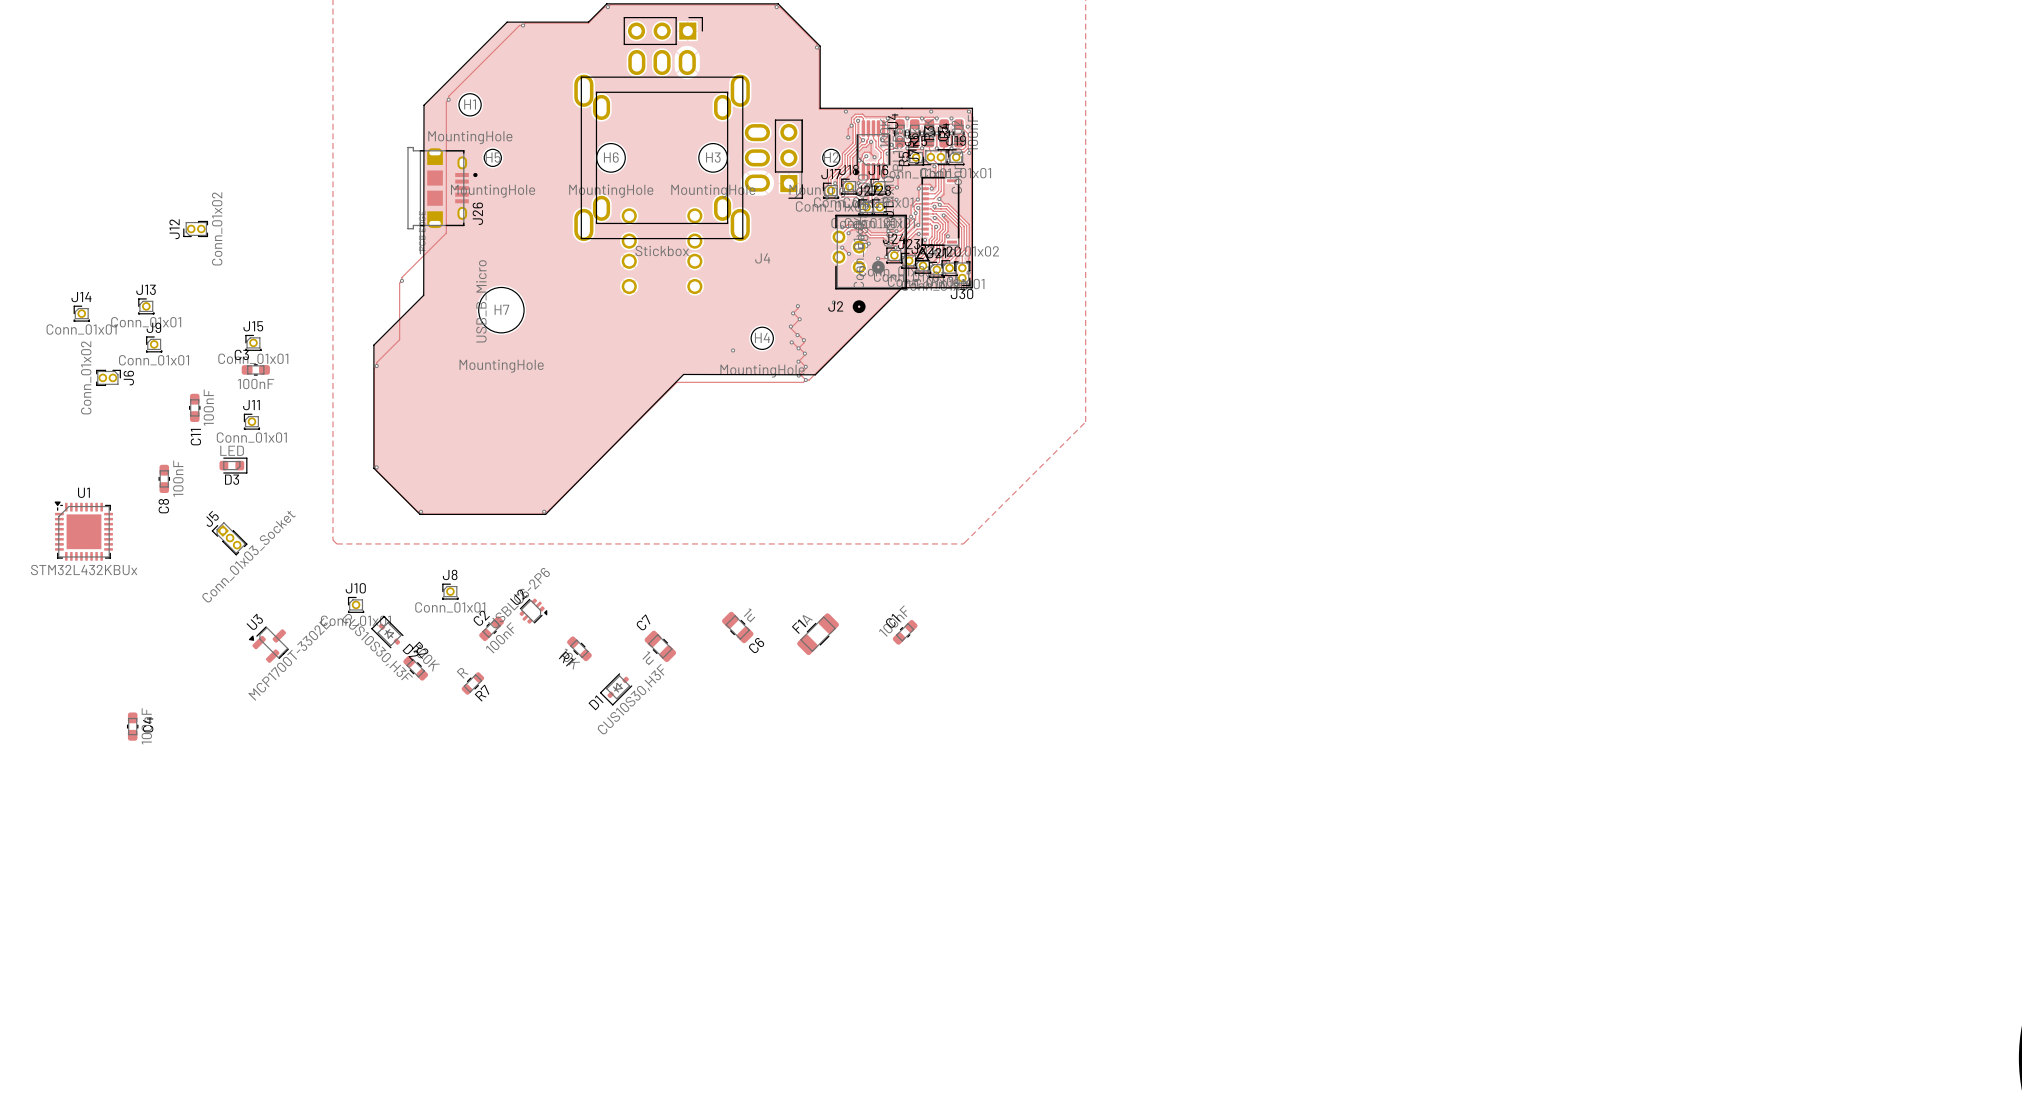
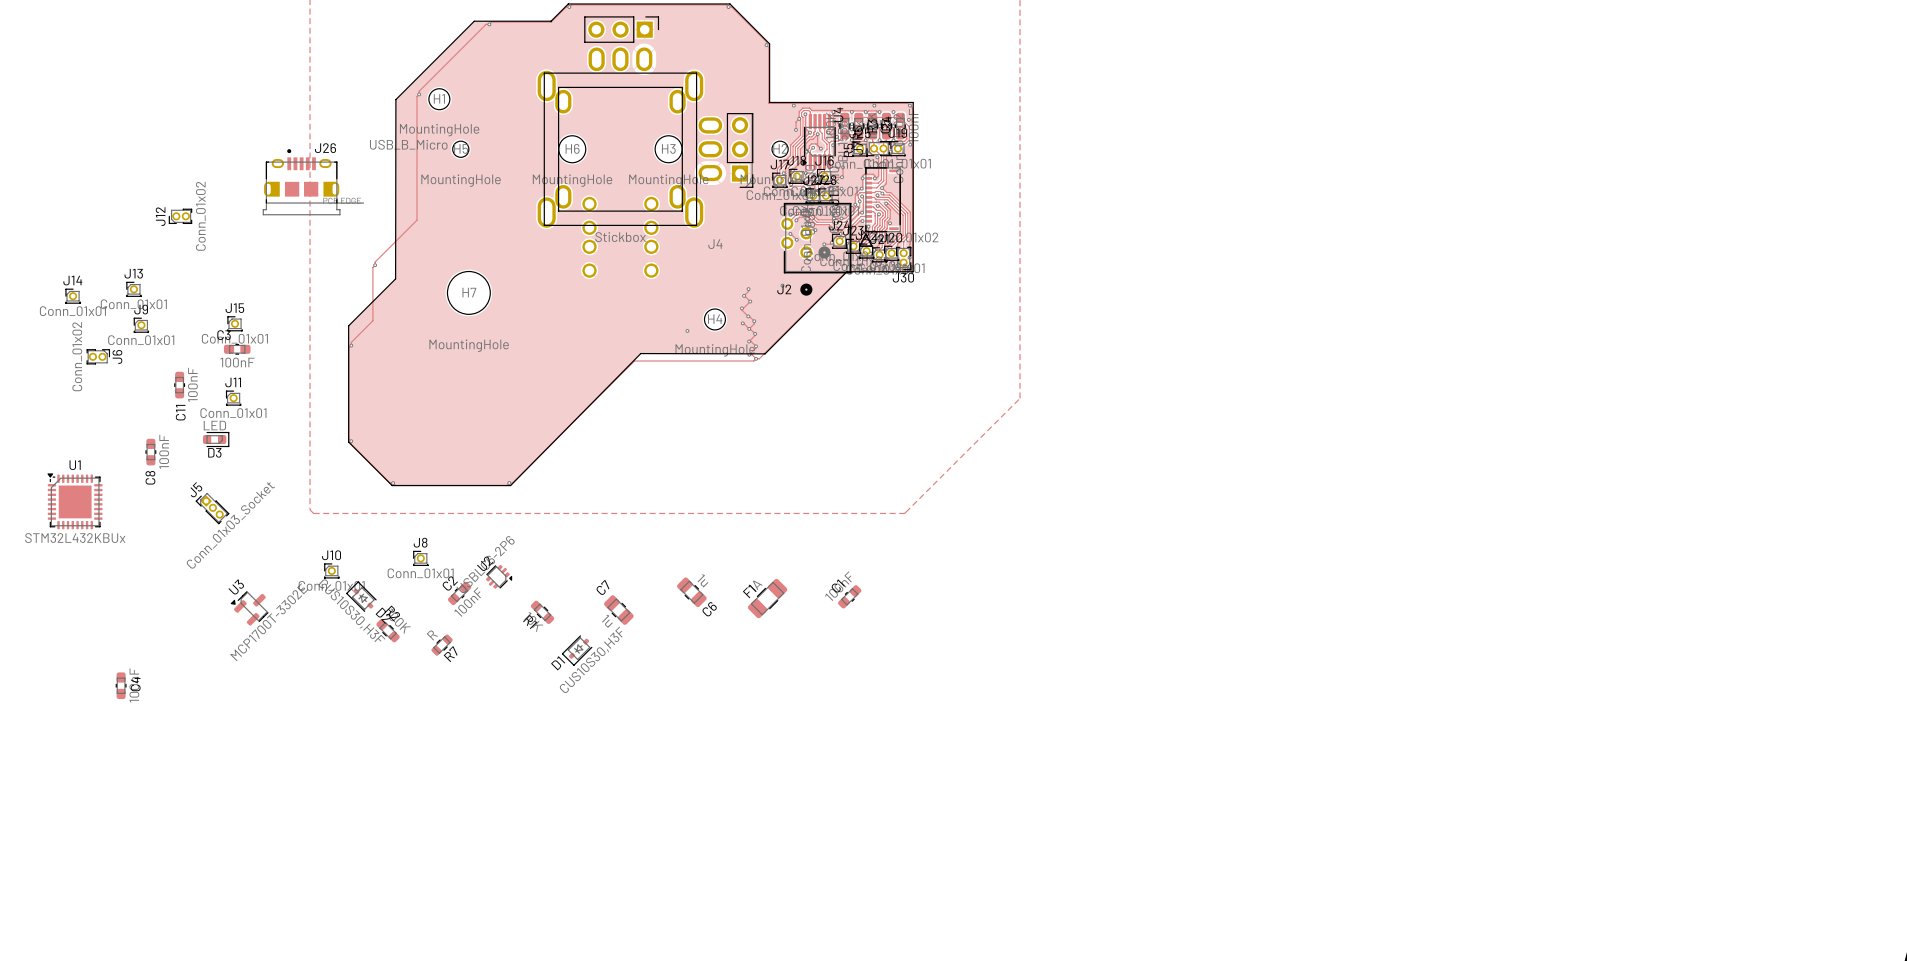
J26 rotation: 0° (442, 200) -> 90° counterclockwise (313, 182)
J26 position: (442, 200) -> (313, 182)

